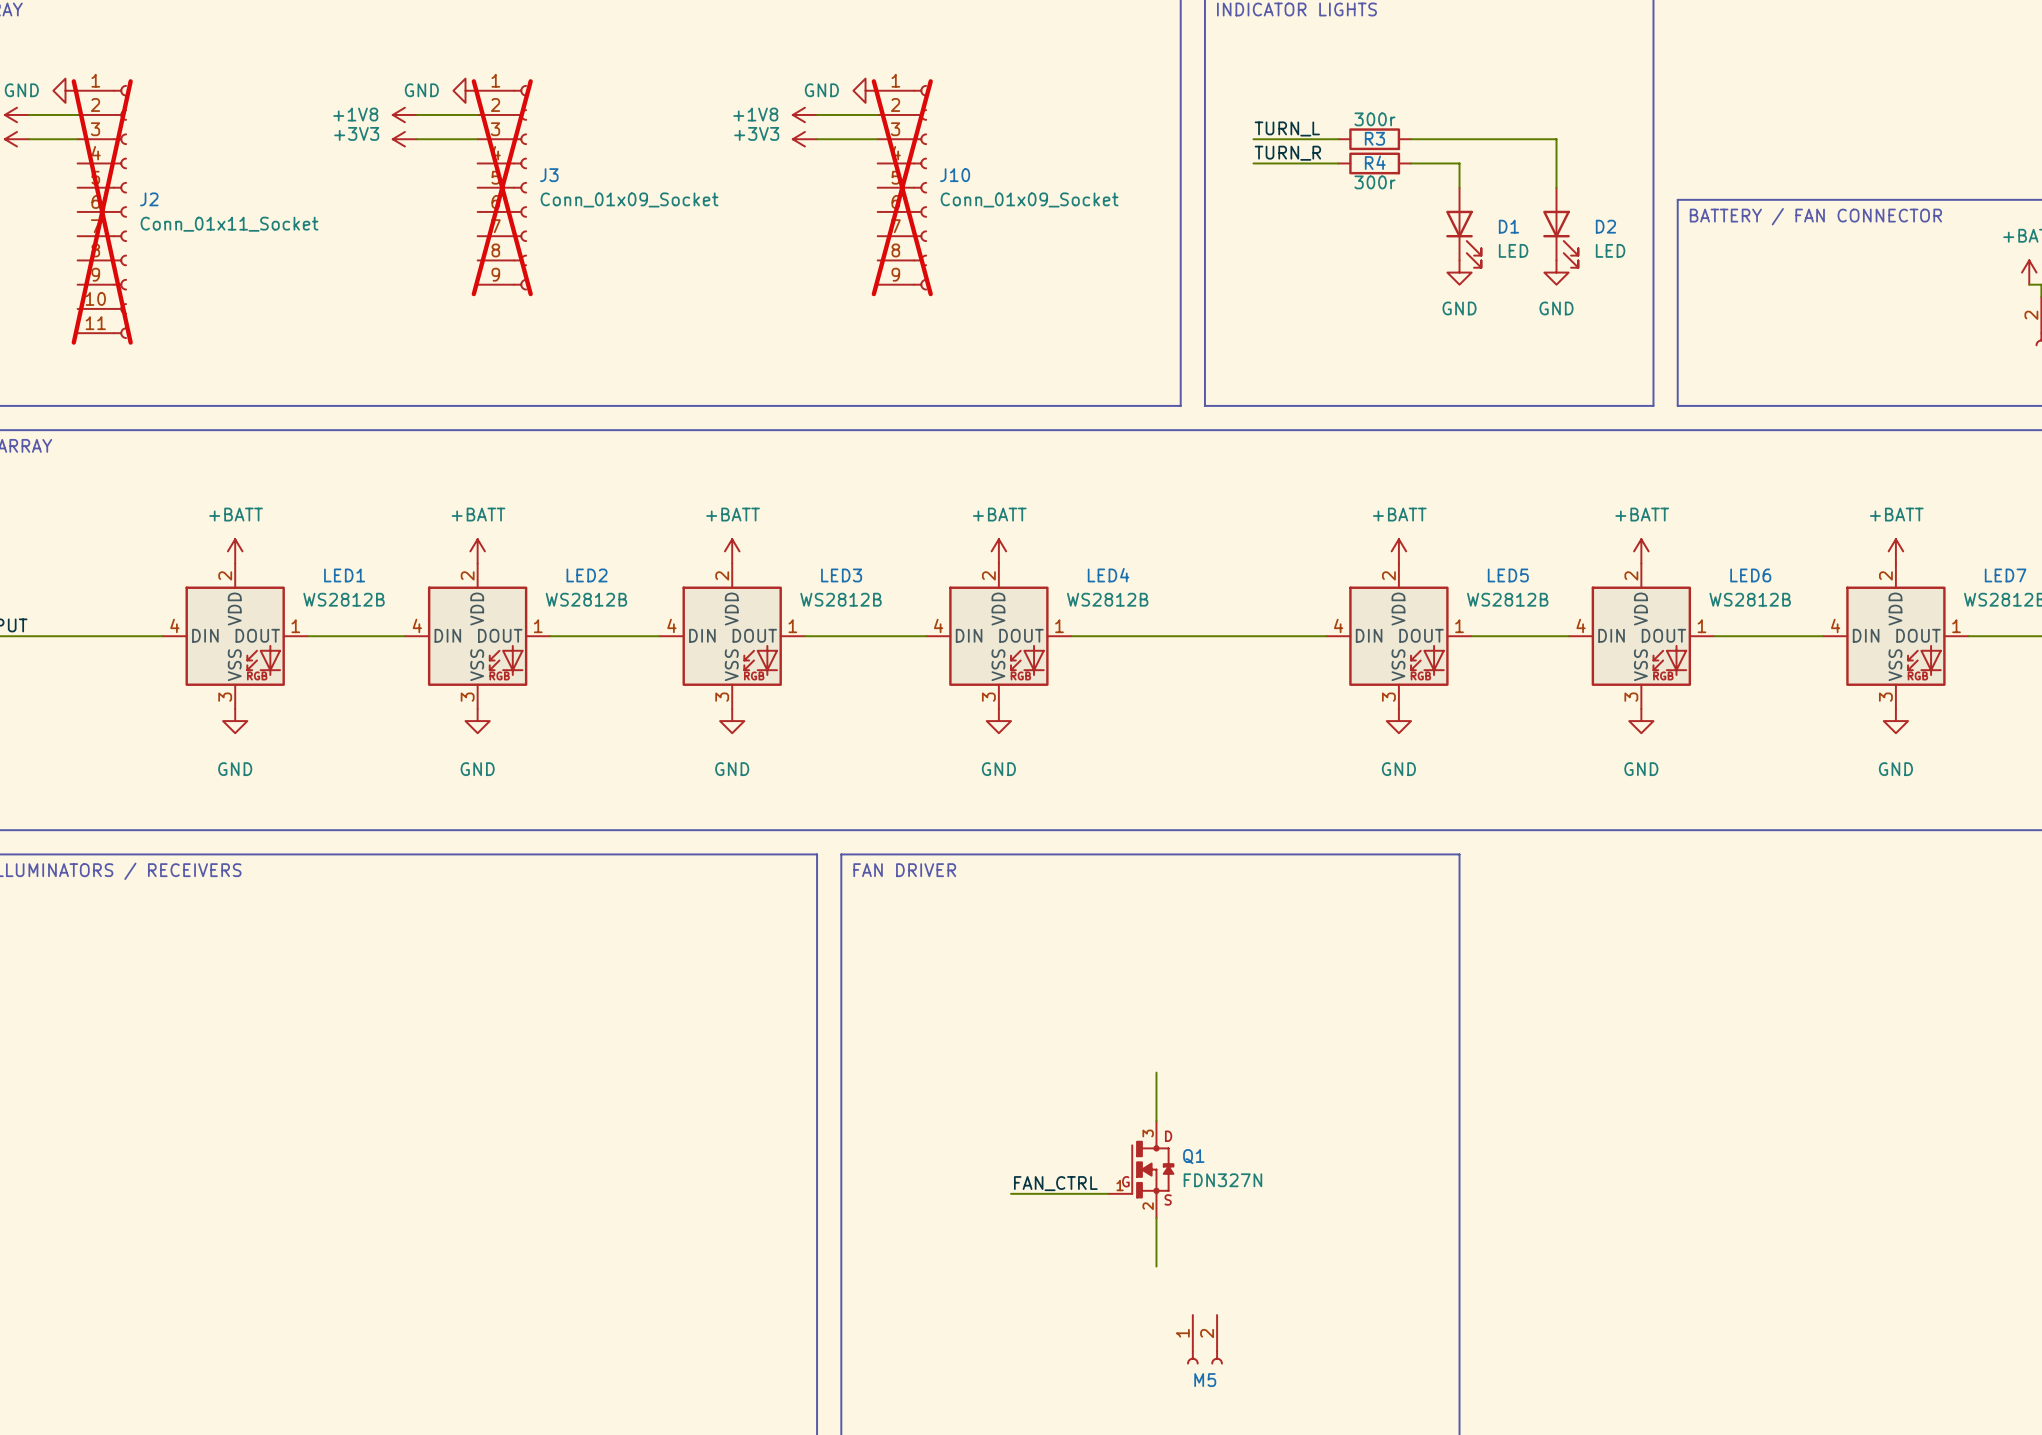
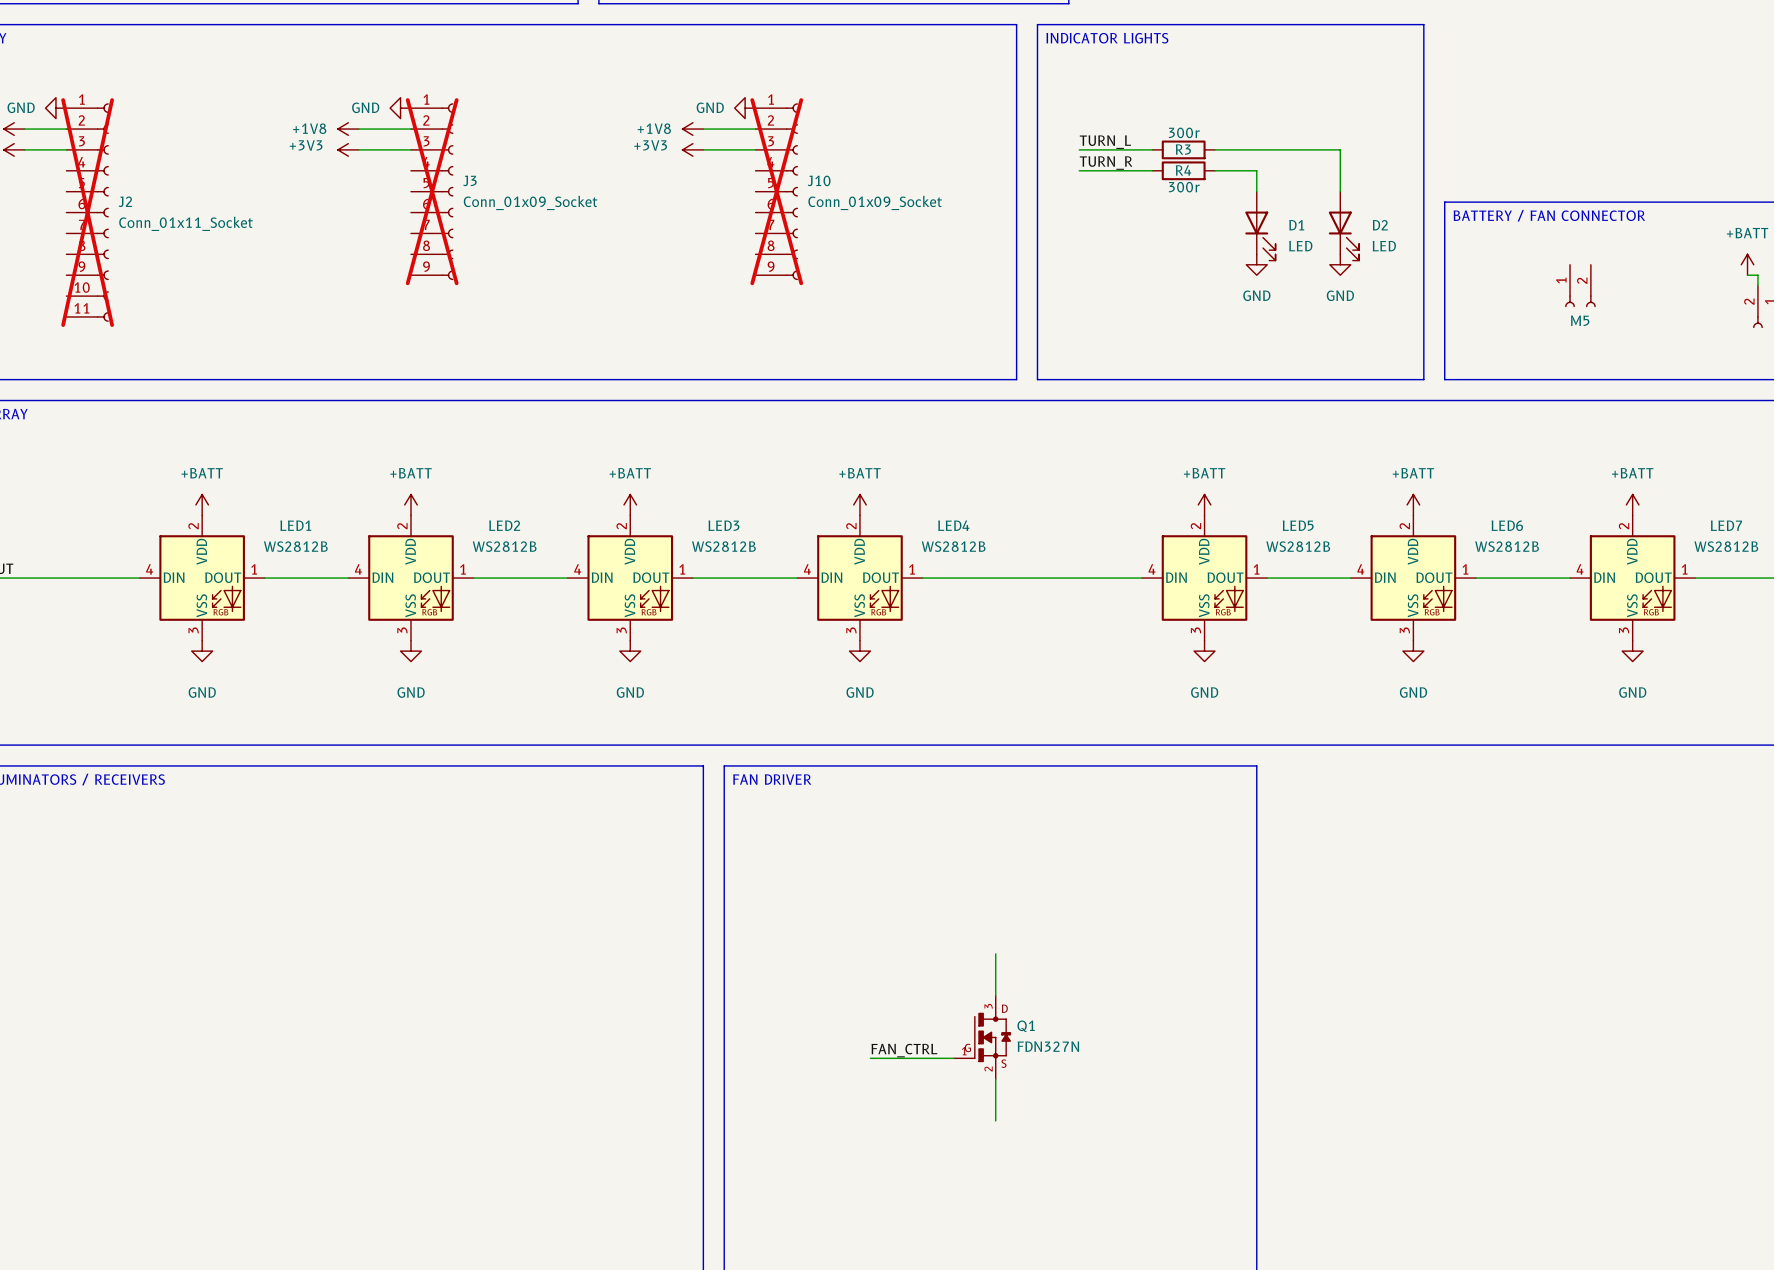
M5 position: (1204, 1339) -> (1580, 285)

